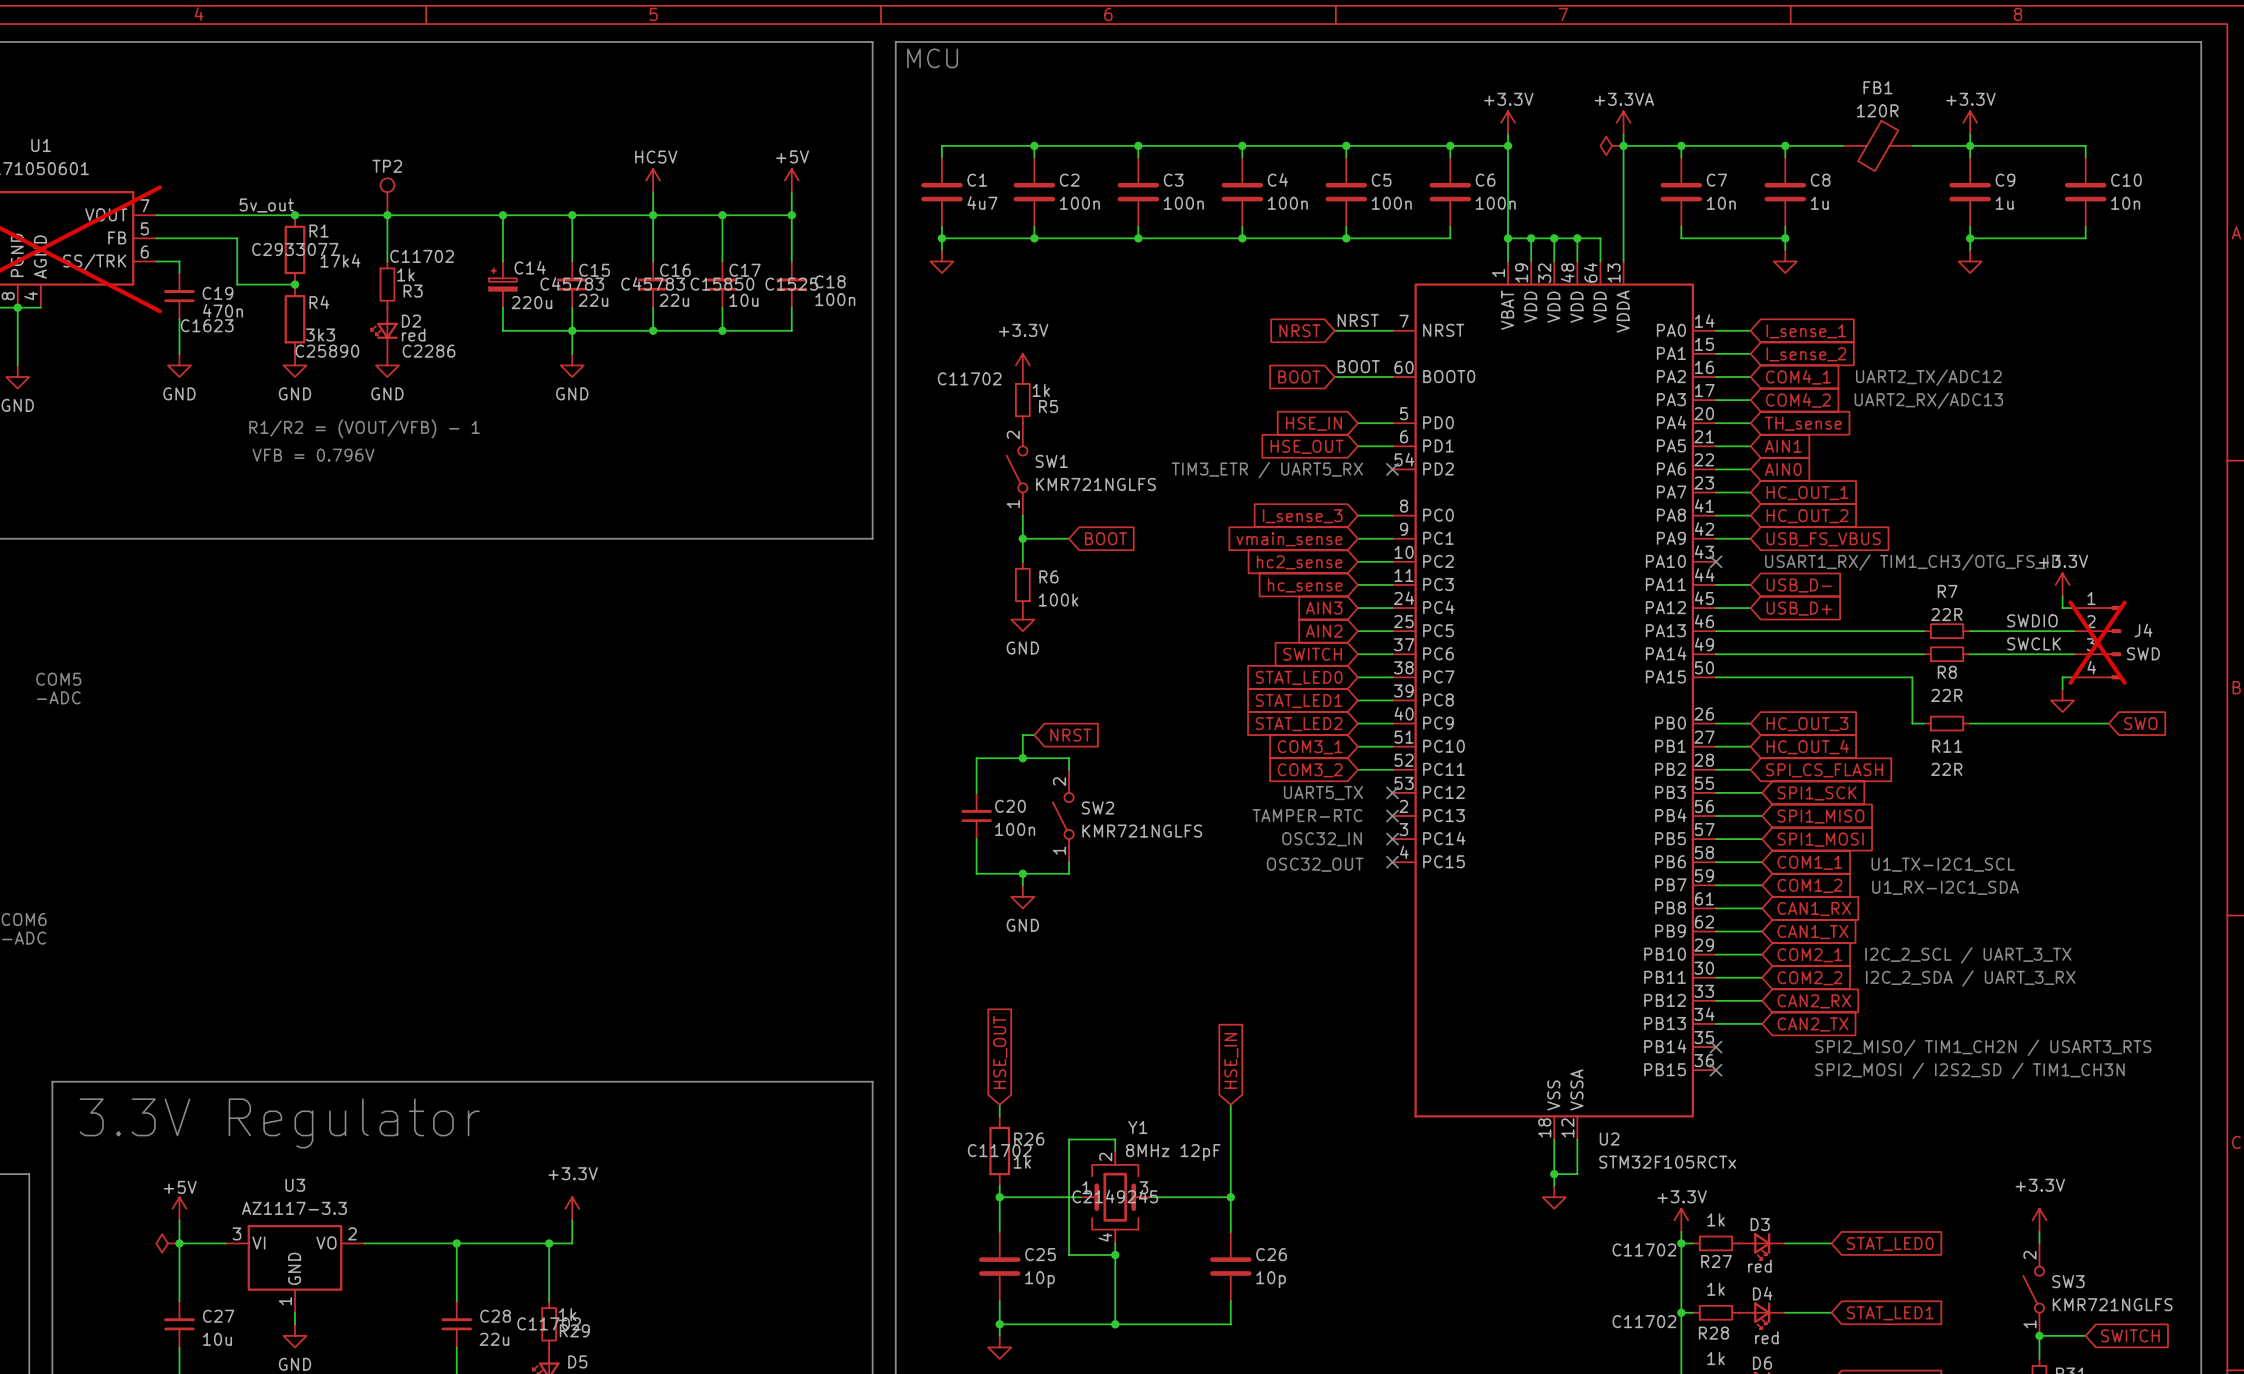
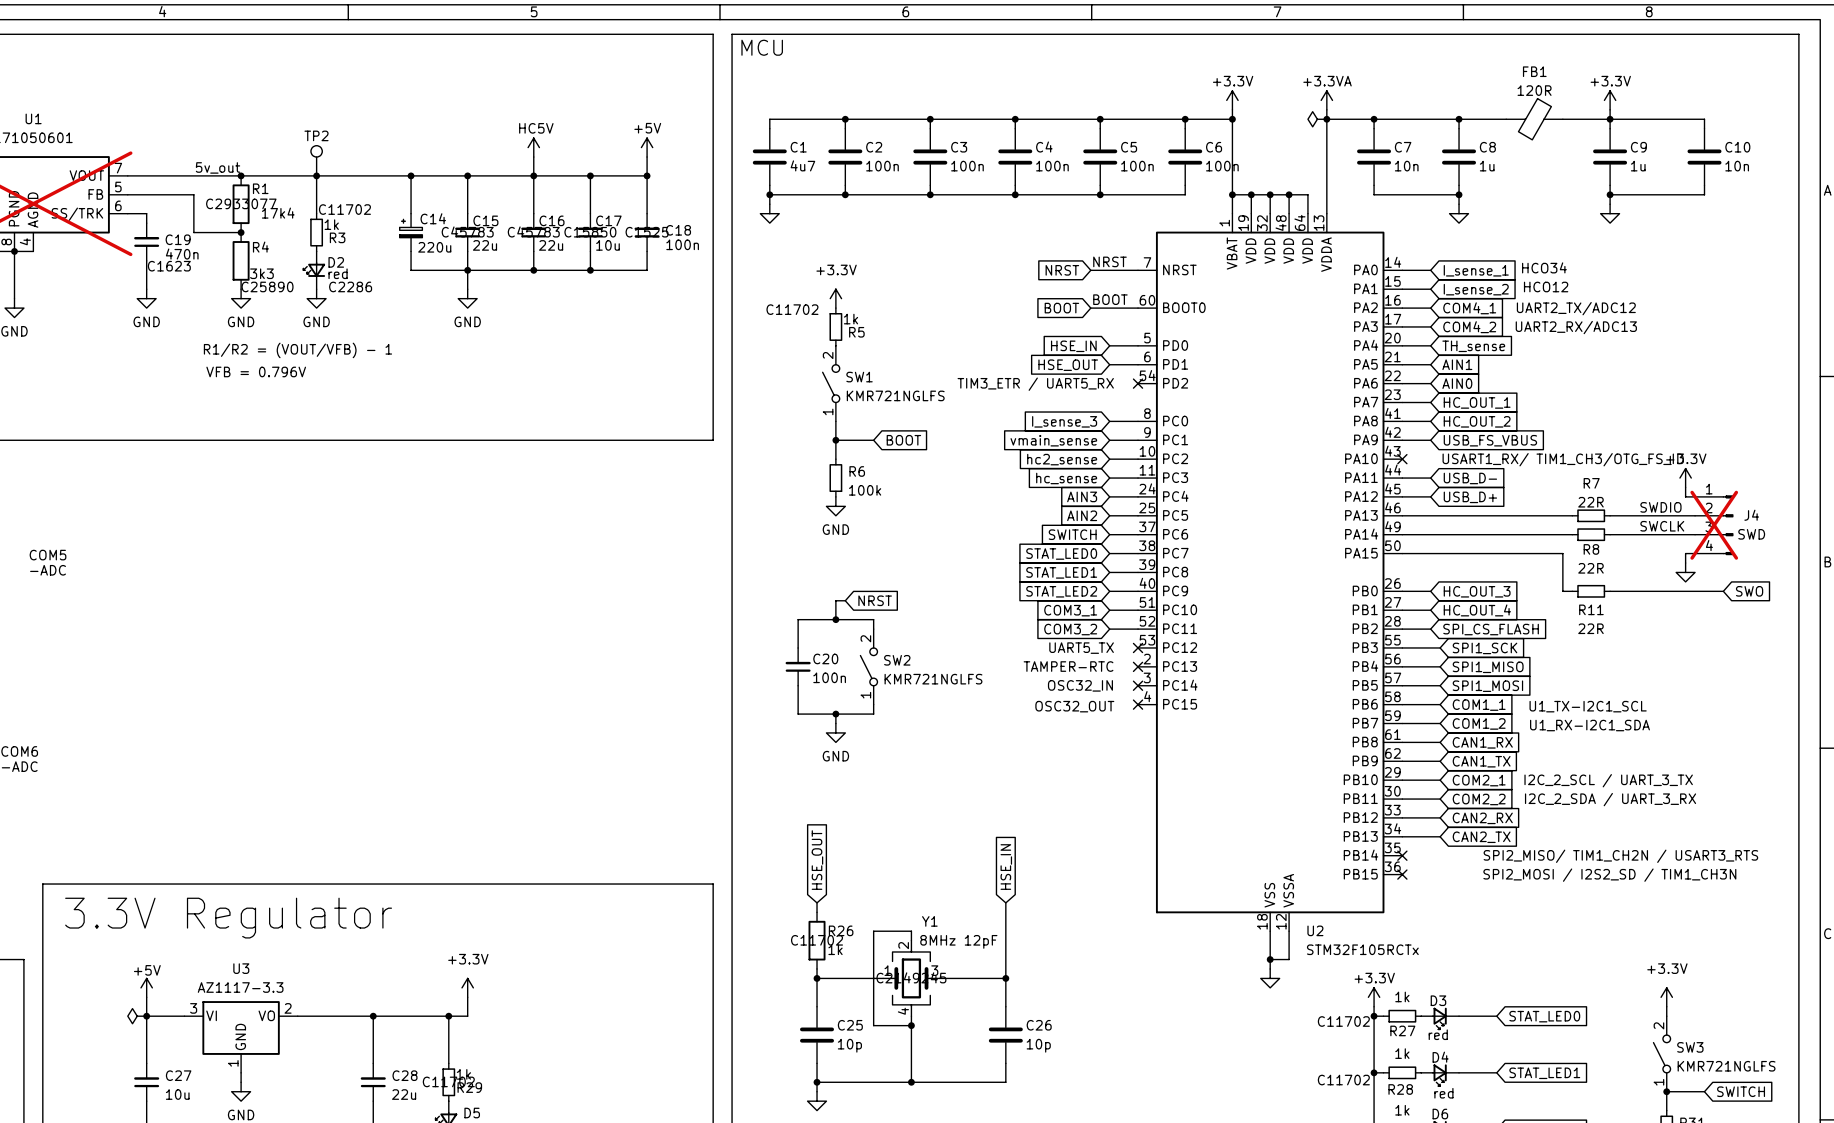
text: none -> HCO34 (1544, 267)
text: none -> HCO12 (1546, 287)

